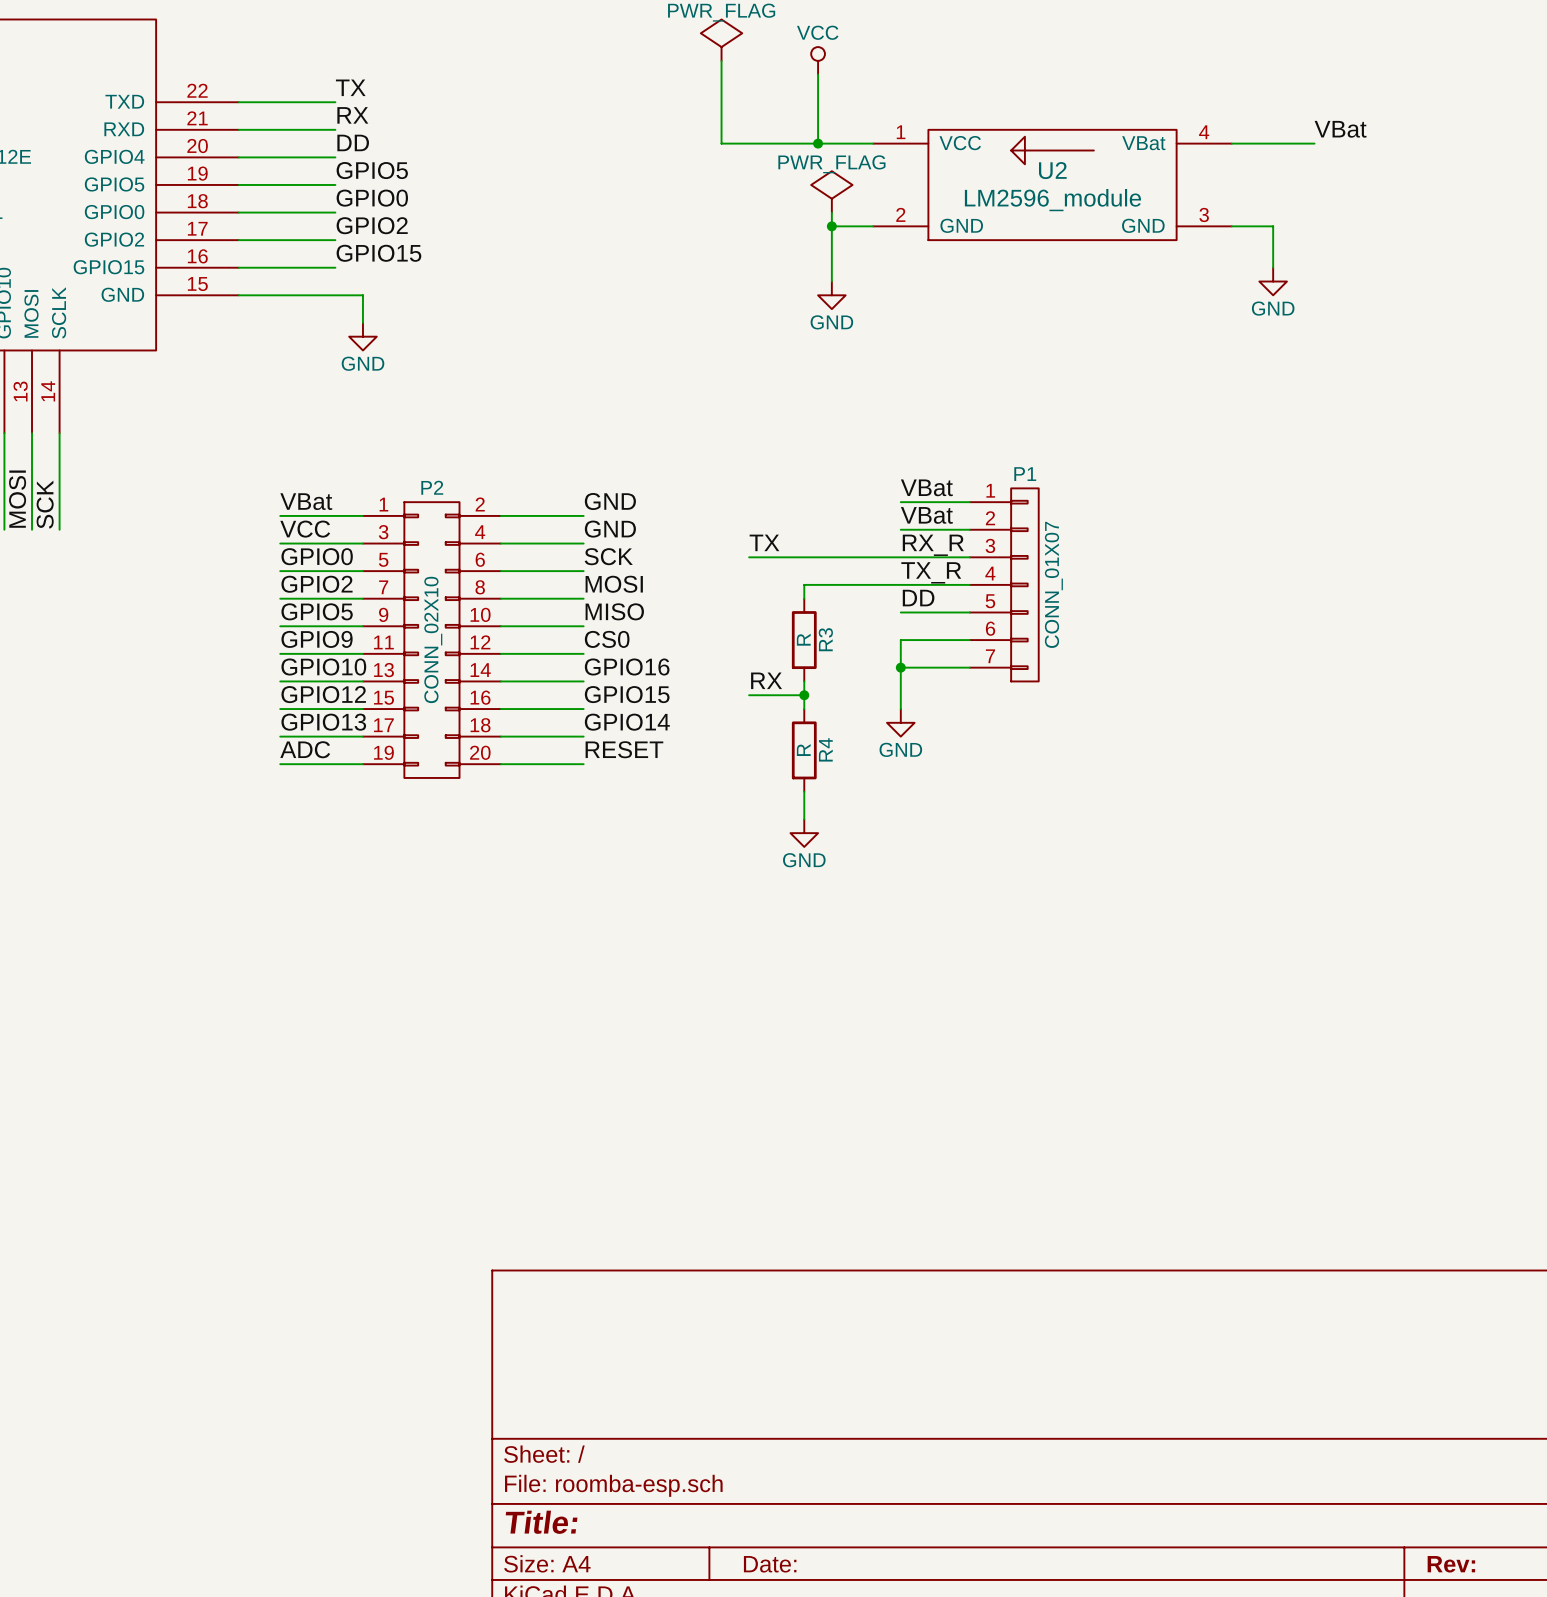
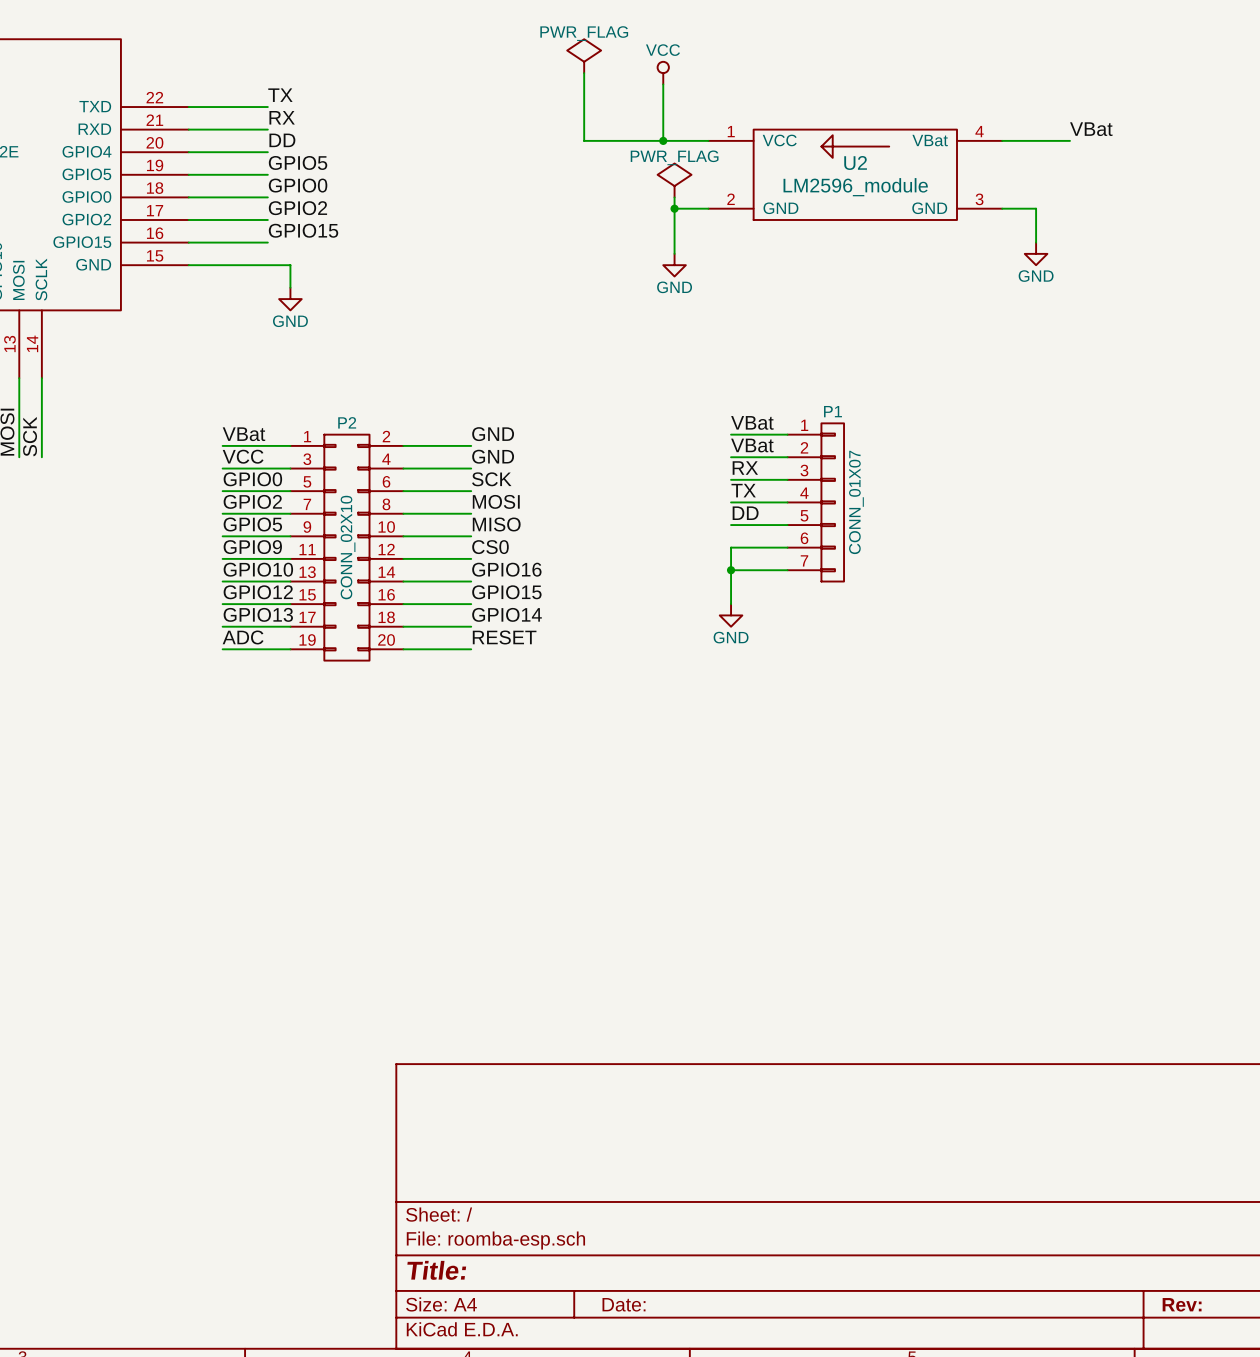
label: TX (764, 542) -> none
label: RX_R (933, 545) -> RX (745, 468)
wire: (749, 557) (900, 557) -> none
label: TX_R (931, 572) -> TX (743, 490)
wire: (900, 584) (804, 584) (804, 598) -> none
R3: R (804, 640) -> none
label: RX (766, 680) -> none
wire: (804, 681) (804, 709) -> none
wire: (749, 695) (804, 695) -> none
junction: (804, 695) -> none
R4: R (804, 750) -> none
wire: (804, 791) (804, 819) -> none
power symbol: GND (804, 833) -> none

